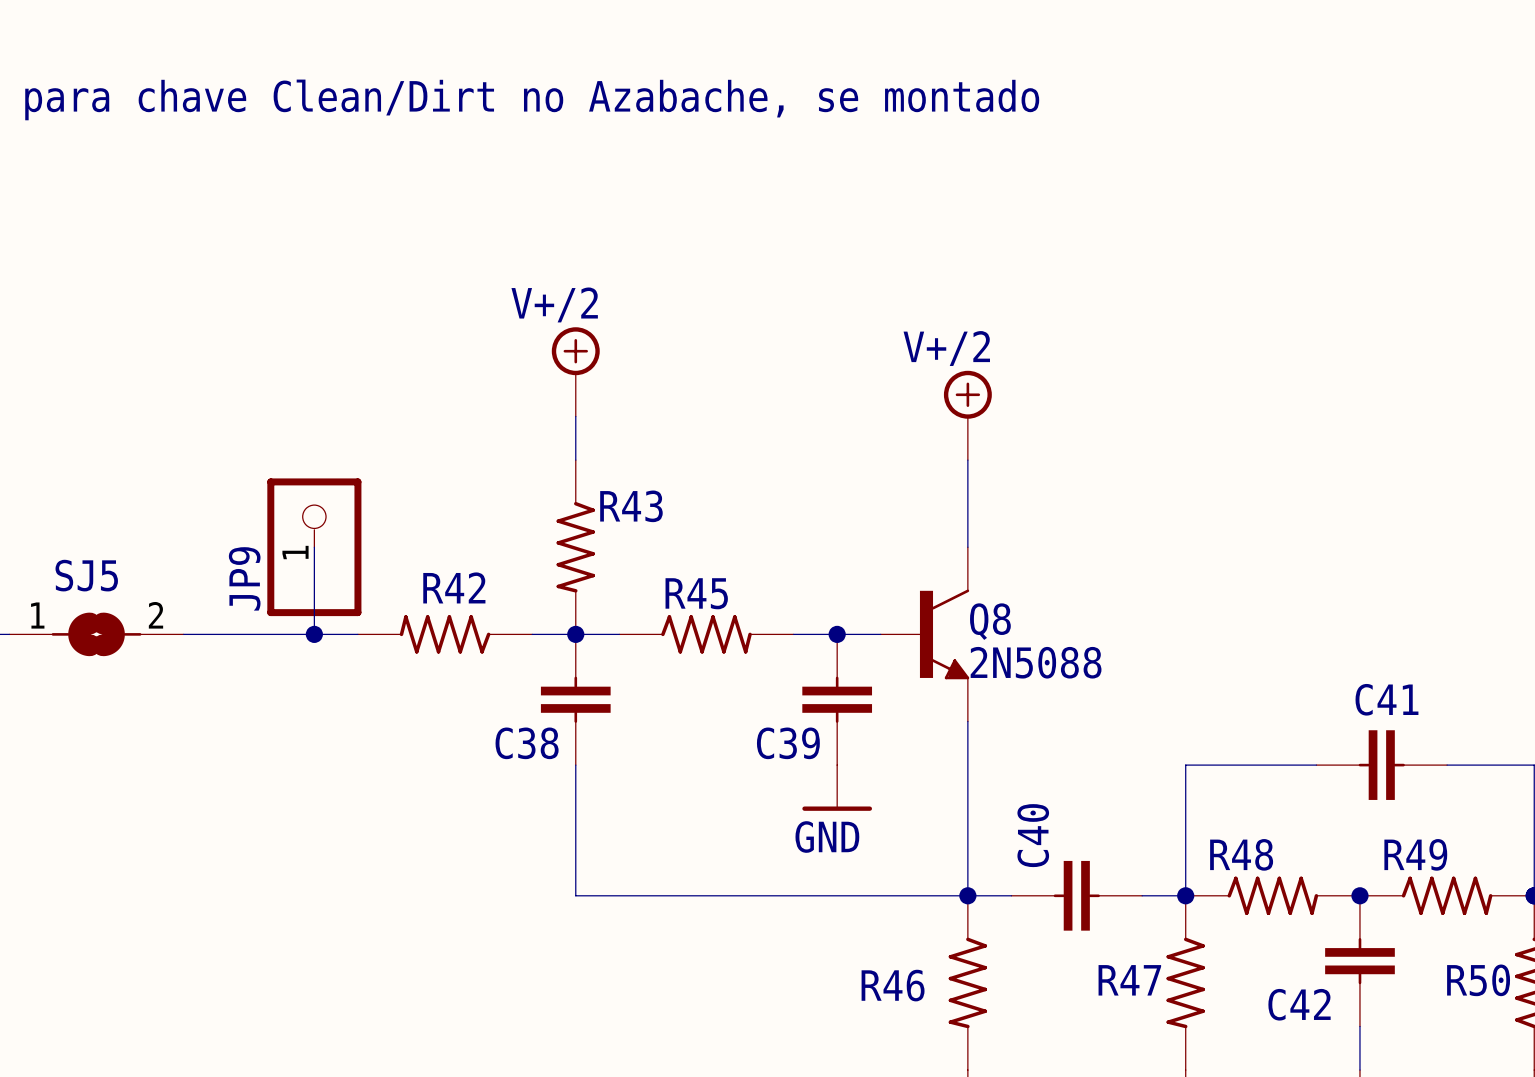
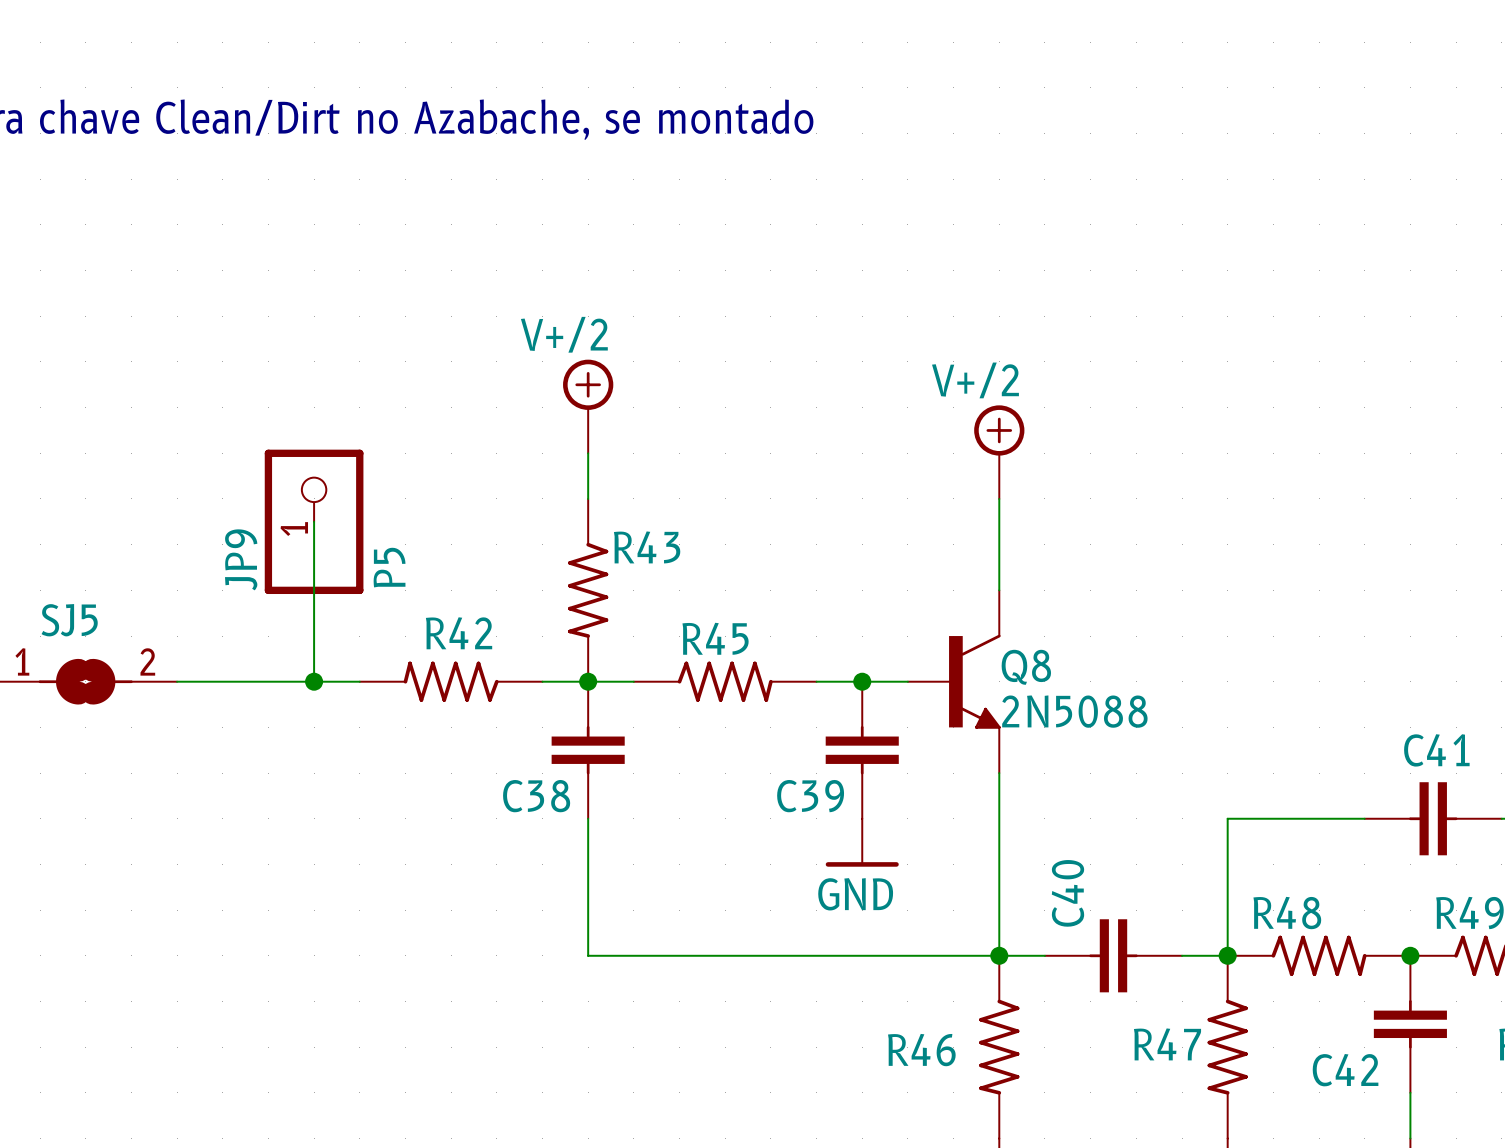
wire: none -> (314, 521) (314, 590)
JP9 value: none -> P5 (389, 567)
JP9 position: (314, 547) -> (314, 521)

